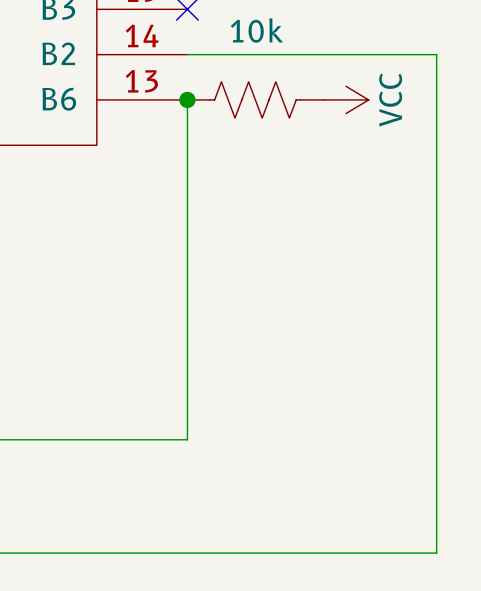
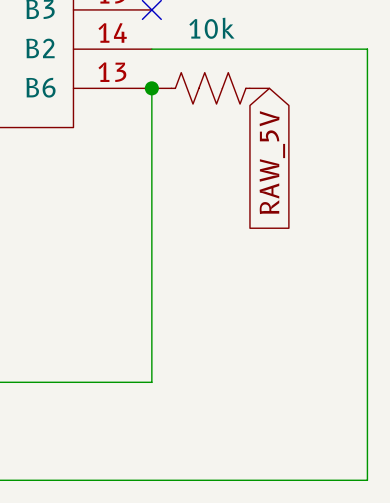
power symbol: VCC (346, 99) -> none
global label: none -> RAW_5V (272, 162)

